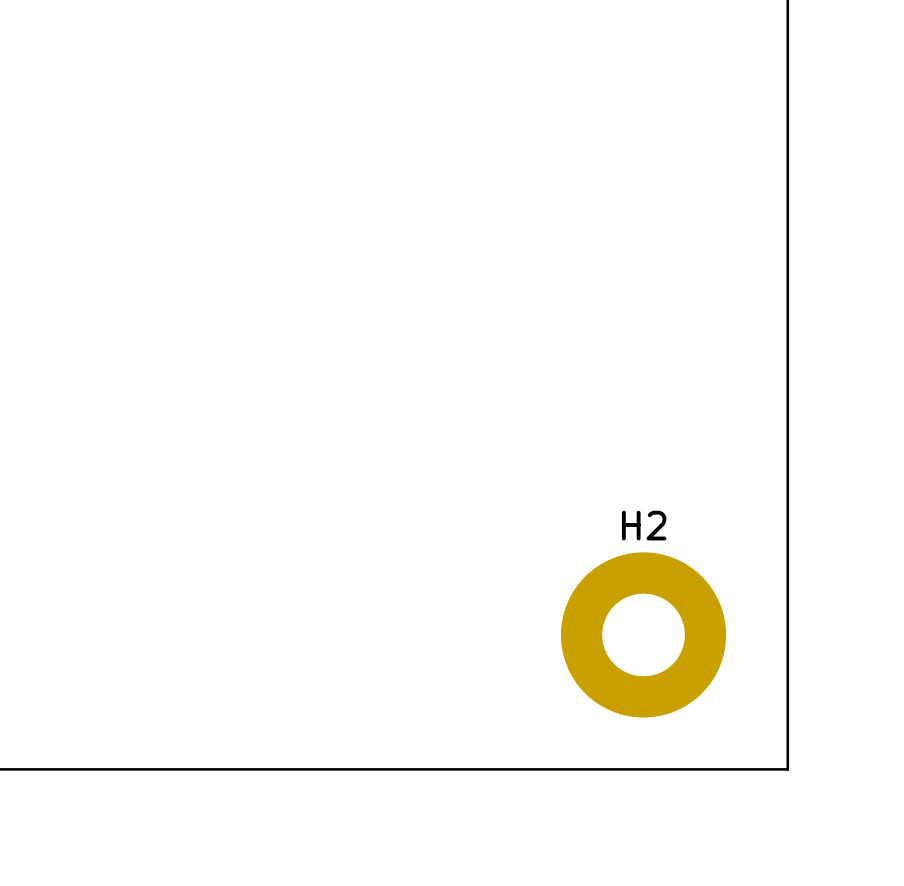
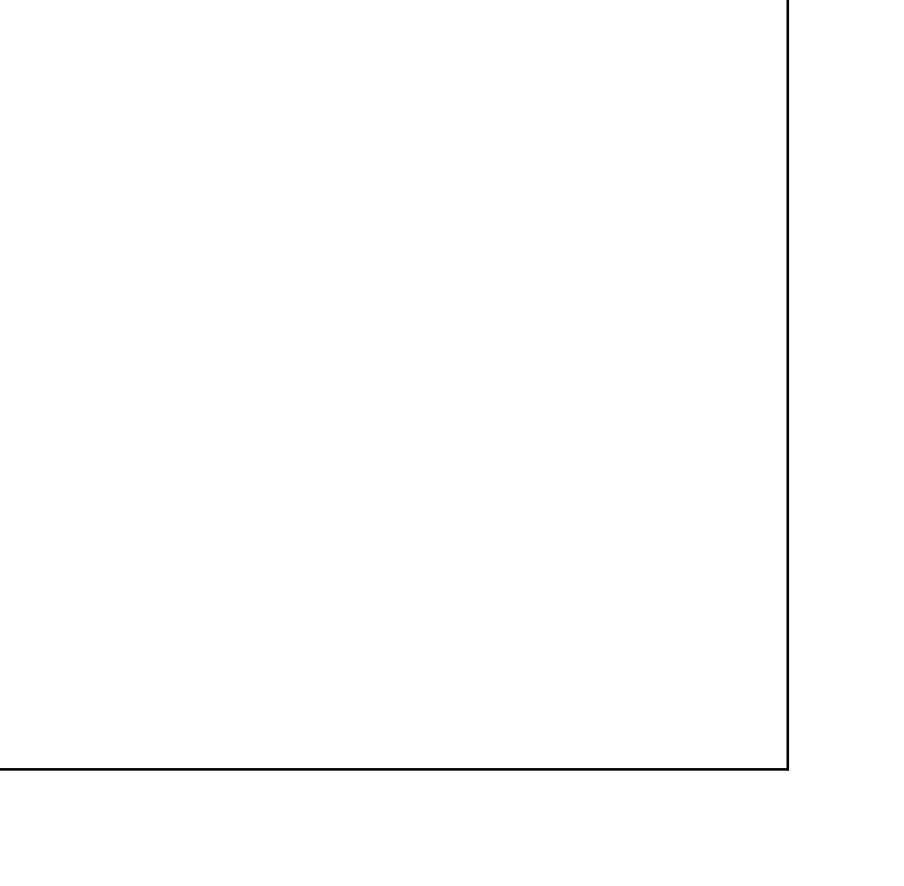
H2: (643, 634) -> none

